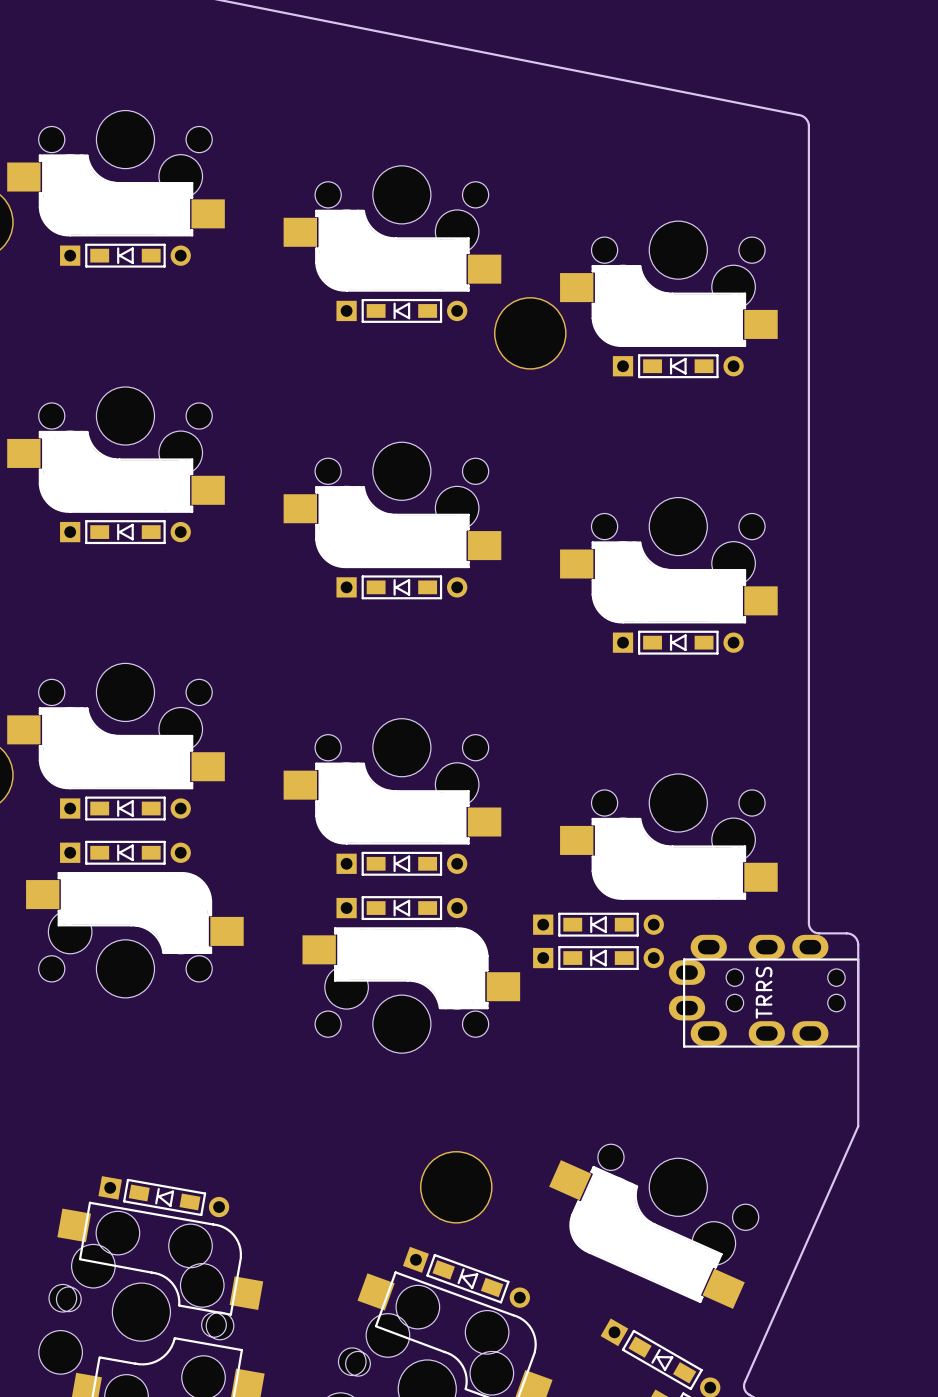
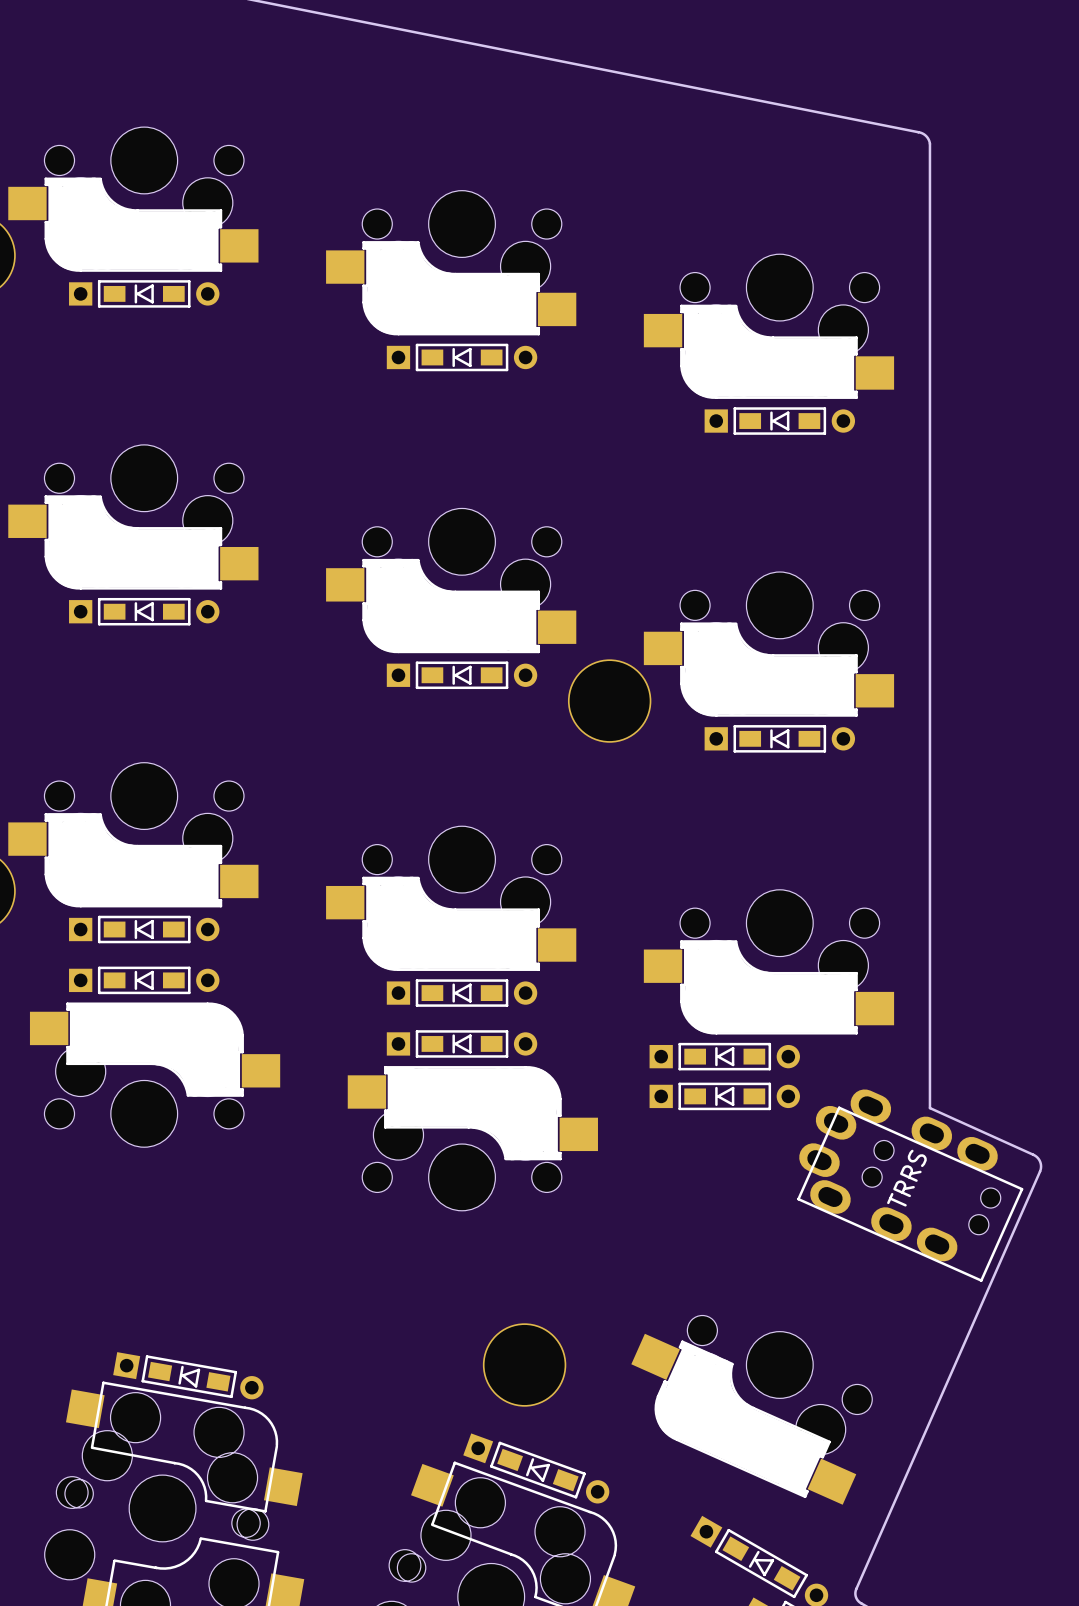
part position: (530, 333) -> (609, 701)
part: none -> (724, 1056)
board edge: (808, 923) (810, 928) (815, 932) (849, 933) (854, 936) (857, 941) (858, 1126) (745, 1381) -> (929, 1061) (929, 1108) (1034, 1155) (1039, 1160) (1040, 1168) (856, 1588)
part: (598, 924) -> none
part: none -> (724, 1096)
part: (598, 958) -> none
part: (764, 991) -> none
part: none -> (910, 1185)

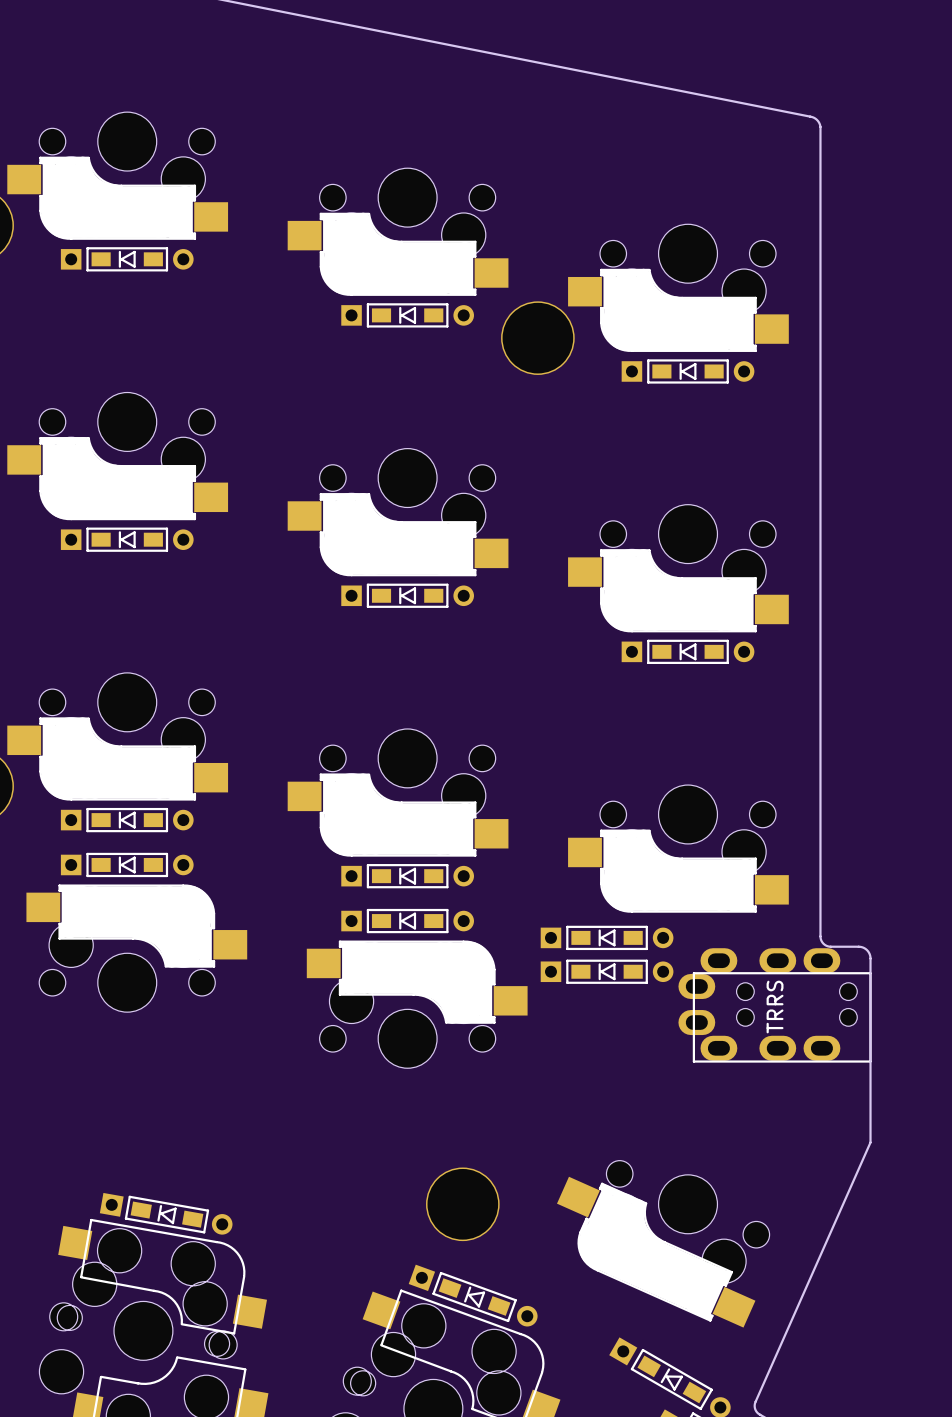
part position: (609, 701) -> (537, 338)
part: (724, 1056) -> none
board edge: (929, 1061) (929, 1108) (1034, 1155) (1039, 1160) (1040, 1168) (856, 1588) -> (820, 936) (821, 941) (826, 945) (861, 947) (867, 950) (870, 955) (870, 1142) (755, 1401)
part: none -> (607, 937)
part: (724, 1096) -> none
part: none -> (607, 971)
part: none -> (775, 1005)
part: (910, 1185) -> none

